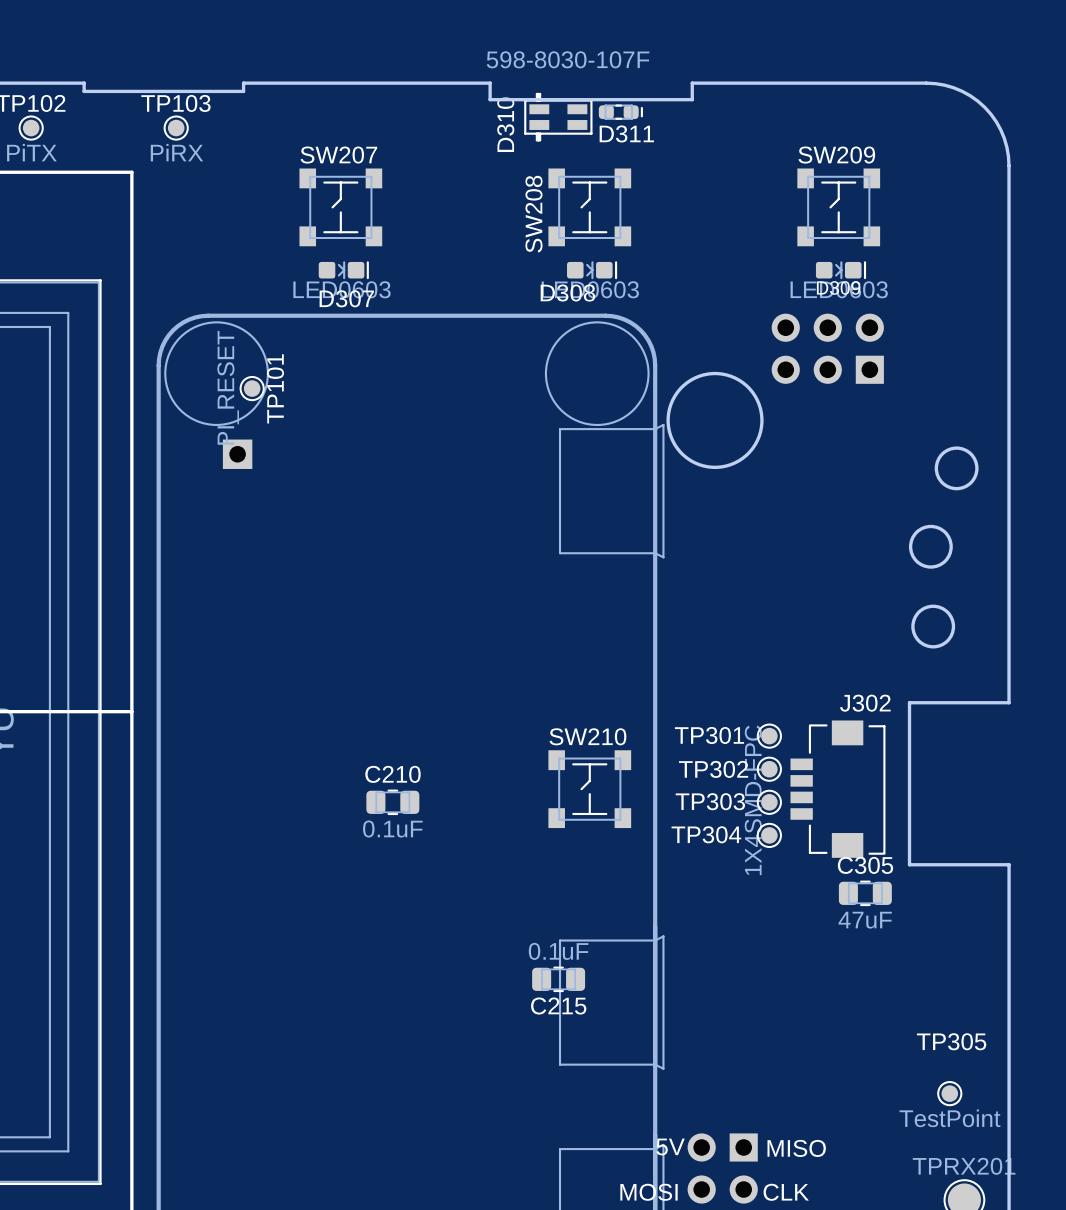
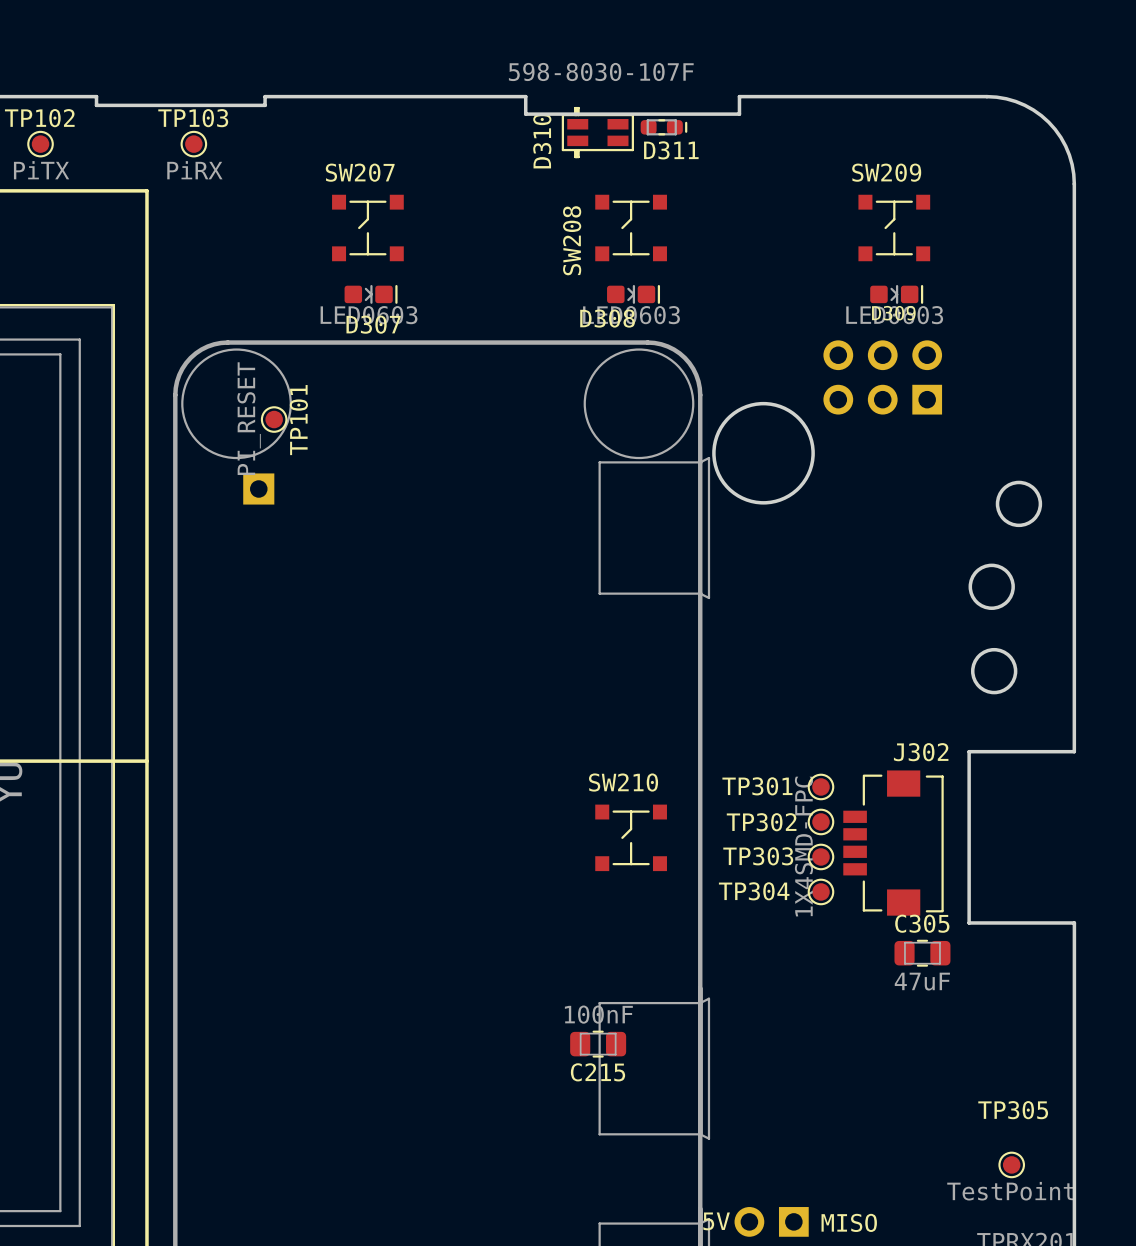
SW207 footprint: [299, 168, 383, 247] -> [332, 194, 404, 262]
SW208 footprint: [548, 168, 632, 247] -> [595, 194, 667, 262]
SW209 footprint: [797, 168, 881, 247] -> [858, 194, 931, 262]
SW210 footprint: [548, 750, 632, 829] -> [595, 804, 667, 872]
C210: 0.1uF (392, 802) -> none
C215 value: 0.1uF (558, 951) -> 100nF (598, 1014)

